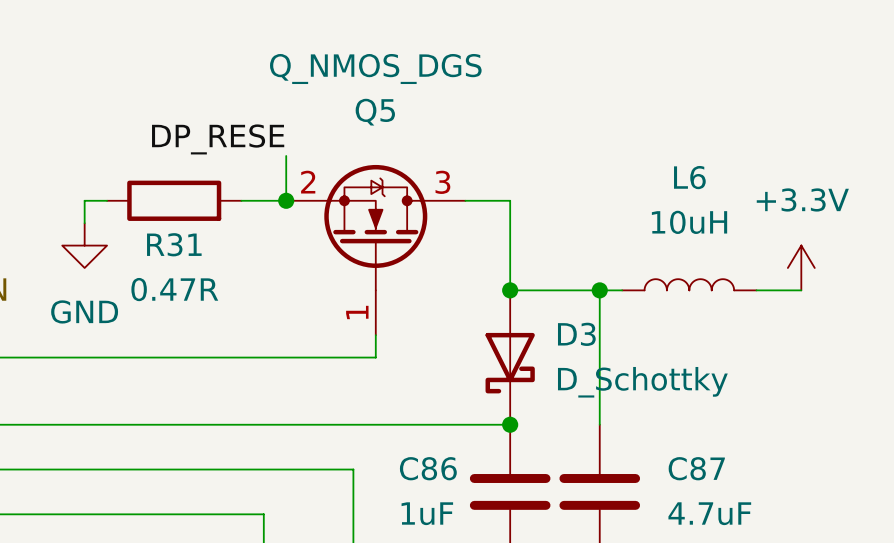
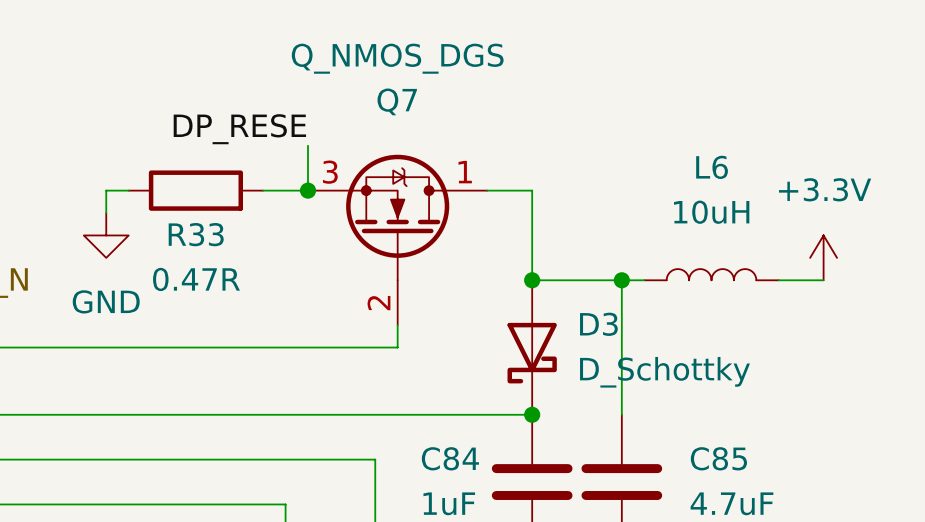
Q5 name: Q5 (375, 112) -> Q7 (397, 101)
Q5 pin number: 2 (308, 182) -> 3 (330, 172)
Q5 pin number: 3 (442, 182) -> 1 (465, 172)
R31 name: R31 (174, 244) -> R33 (196, 234)
Q5 pin number: 1 (357, 312) -> 2 (378, 303)
C86 name: C86 (428, 468) -> C84 (450, 458)
C87 name: C87 (696, 468) -> C85 (718, 458)

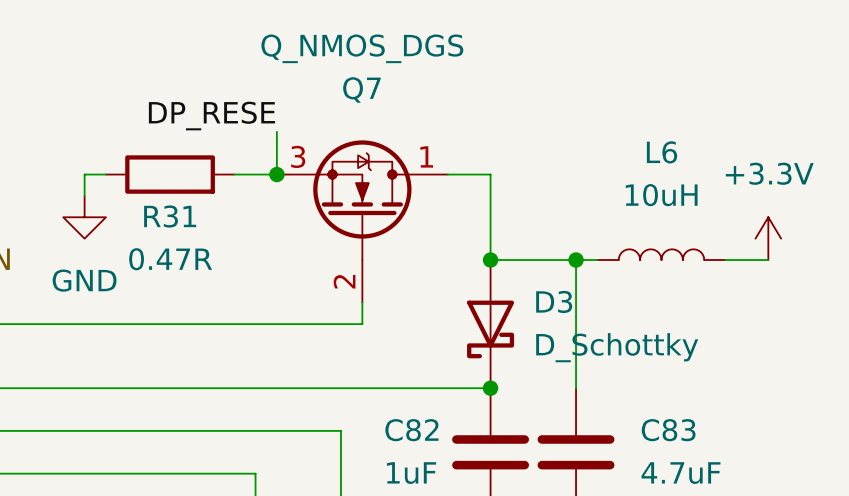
R33 name: R33 (196, 234) -> R31 (170, 216)
C84 name: C84 (450, 458) -> C82 (411, 430)
C85 name: C85 (718, 458) -> C83 (668, 430)

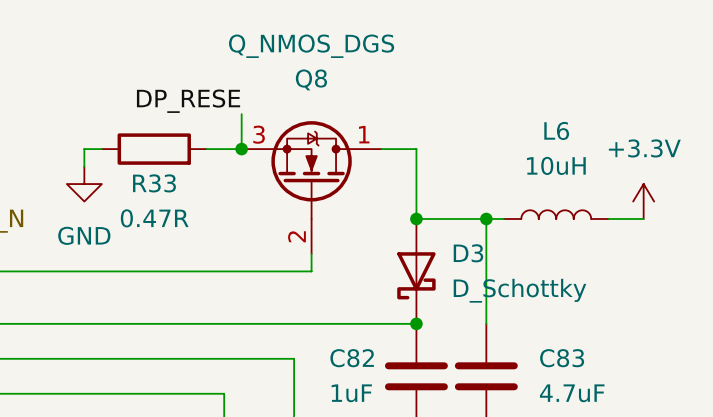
Q7 name: Q7 (361, 89) -> Q8 (311, 79)
R31 name: R31 (170, 216) -> R33 (154, 183)

